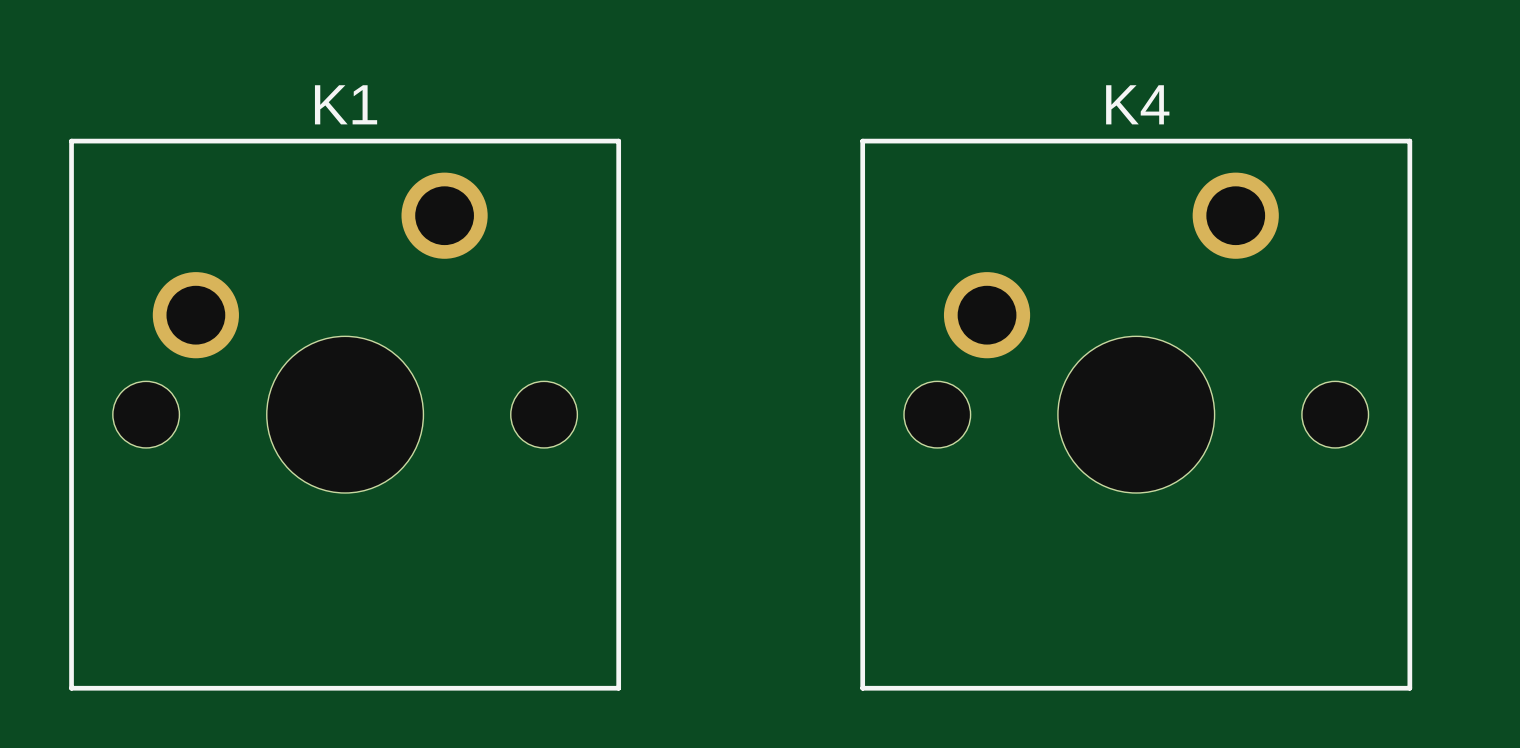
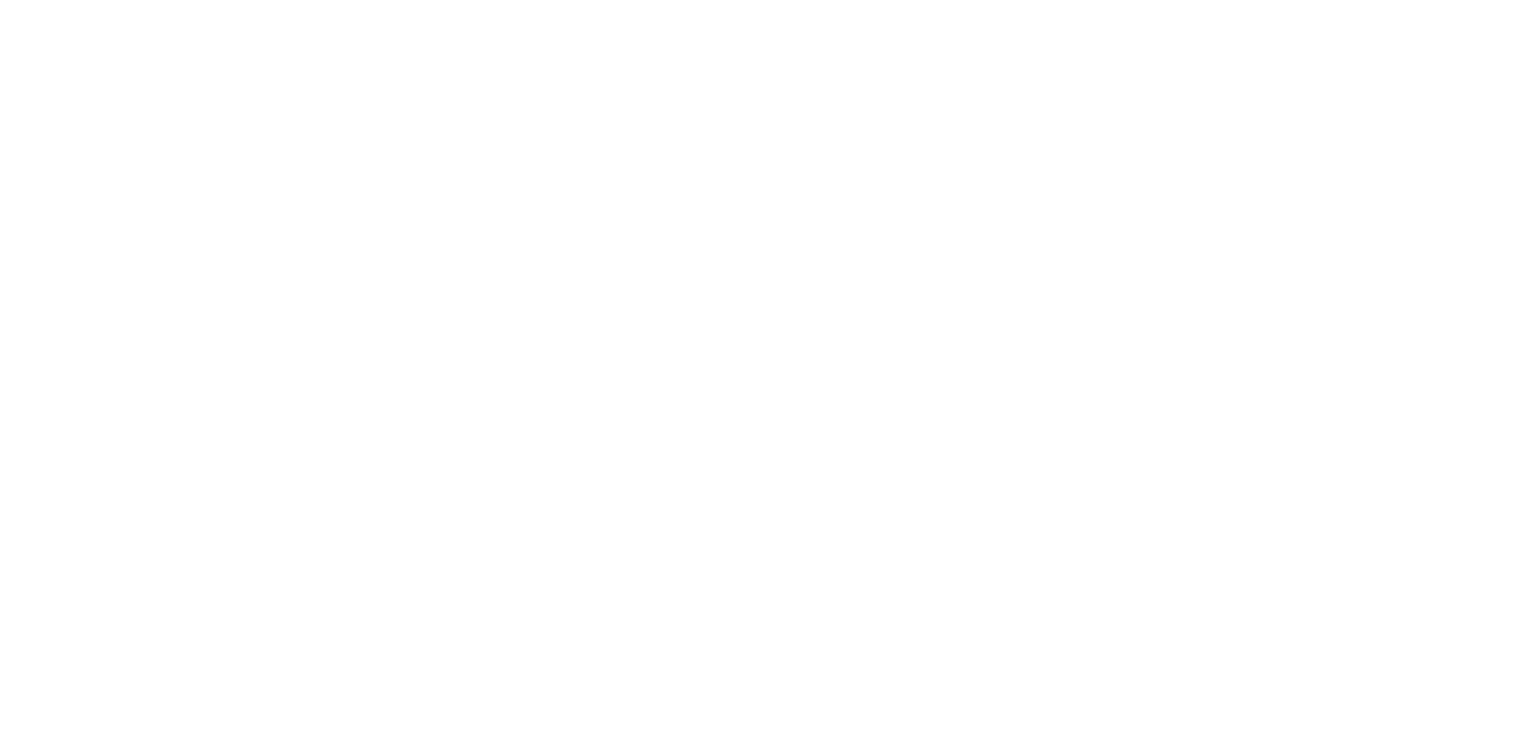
K1: (345, 414) -> none
K4: (1136, 414) -> none

